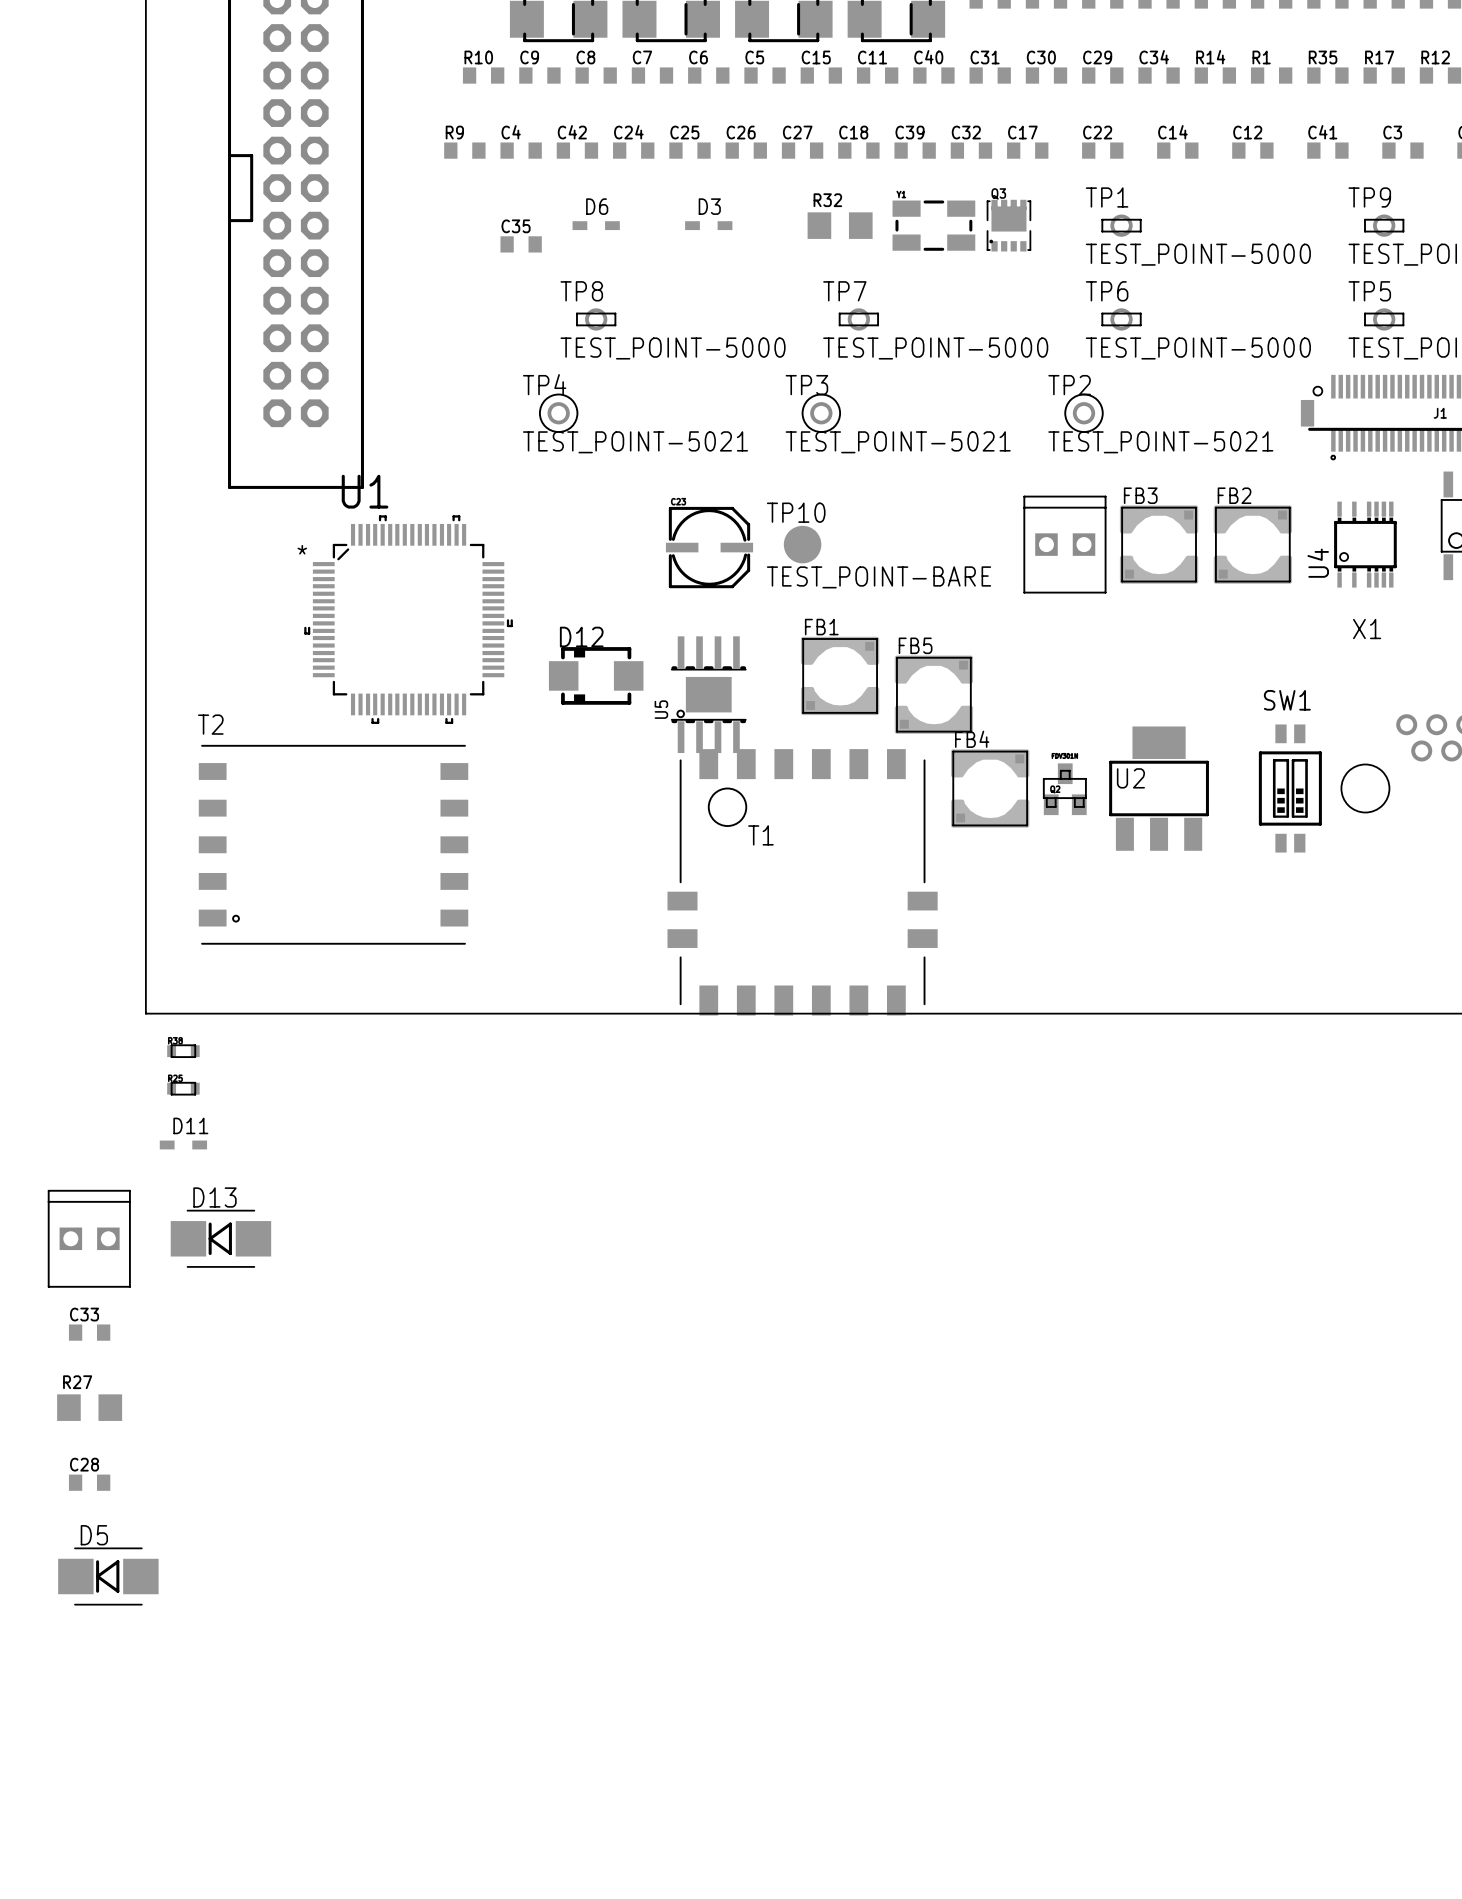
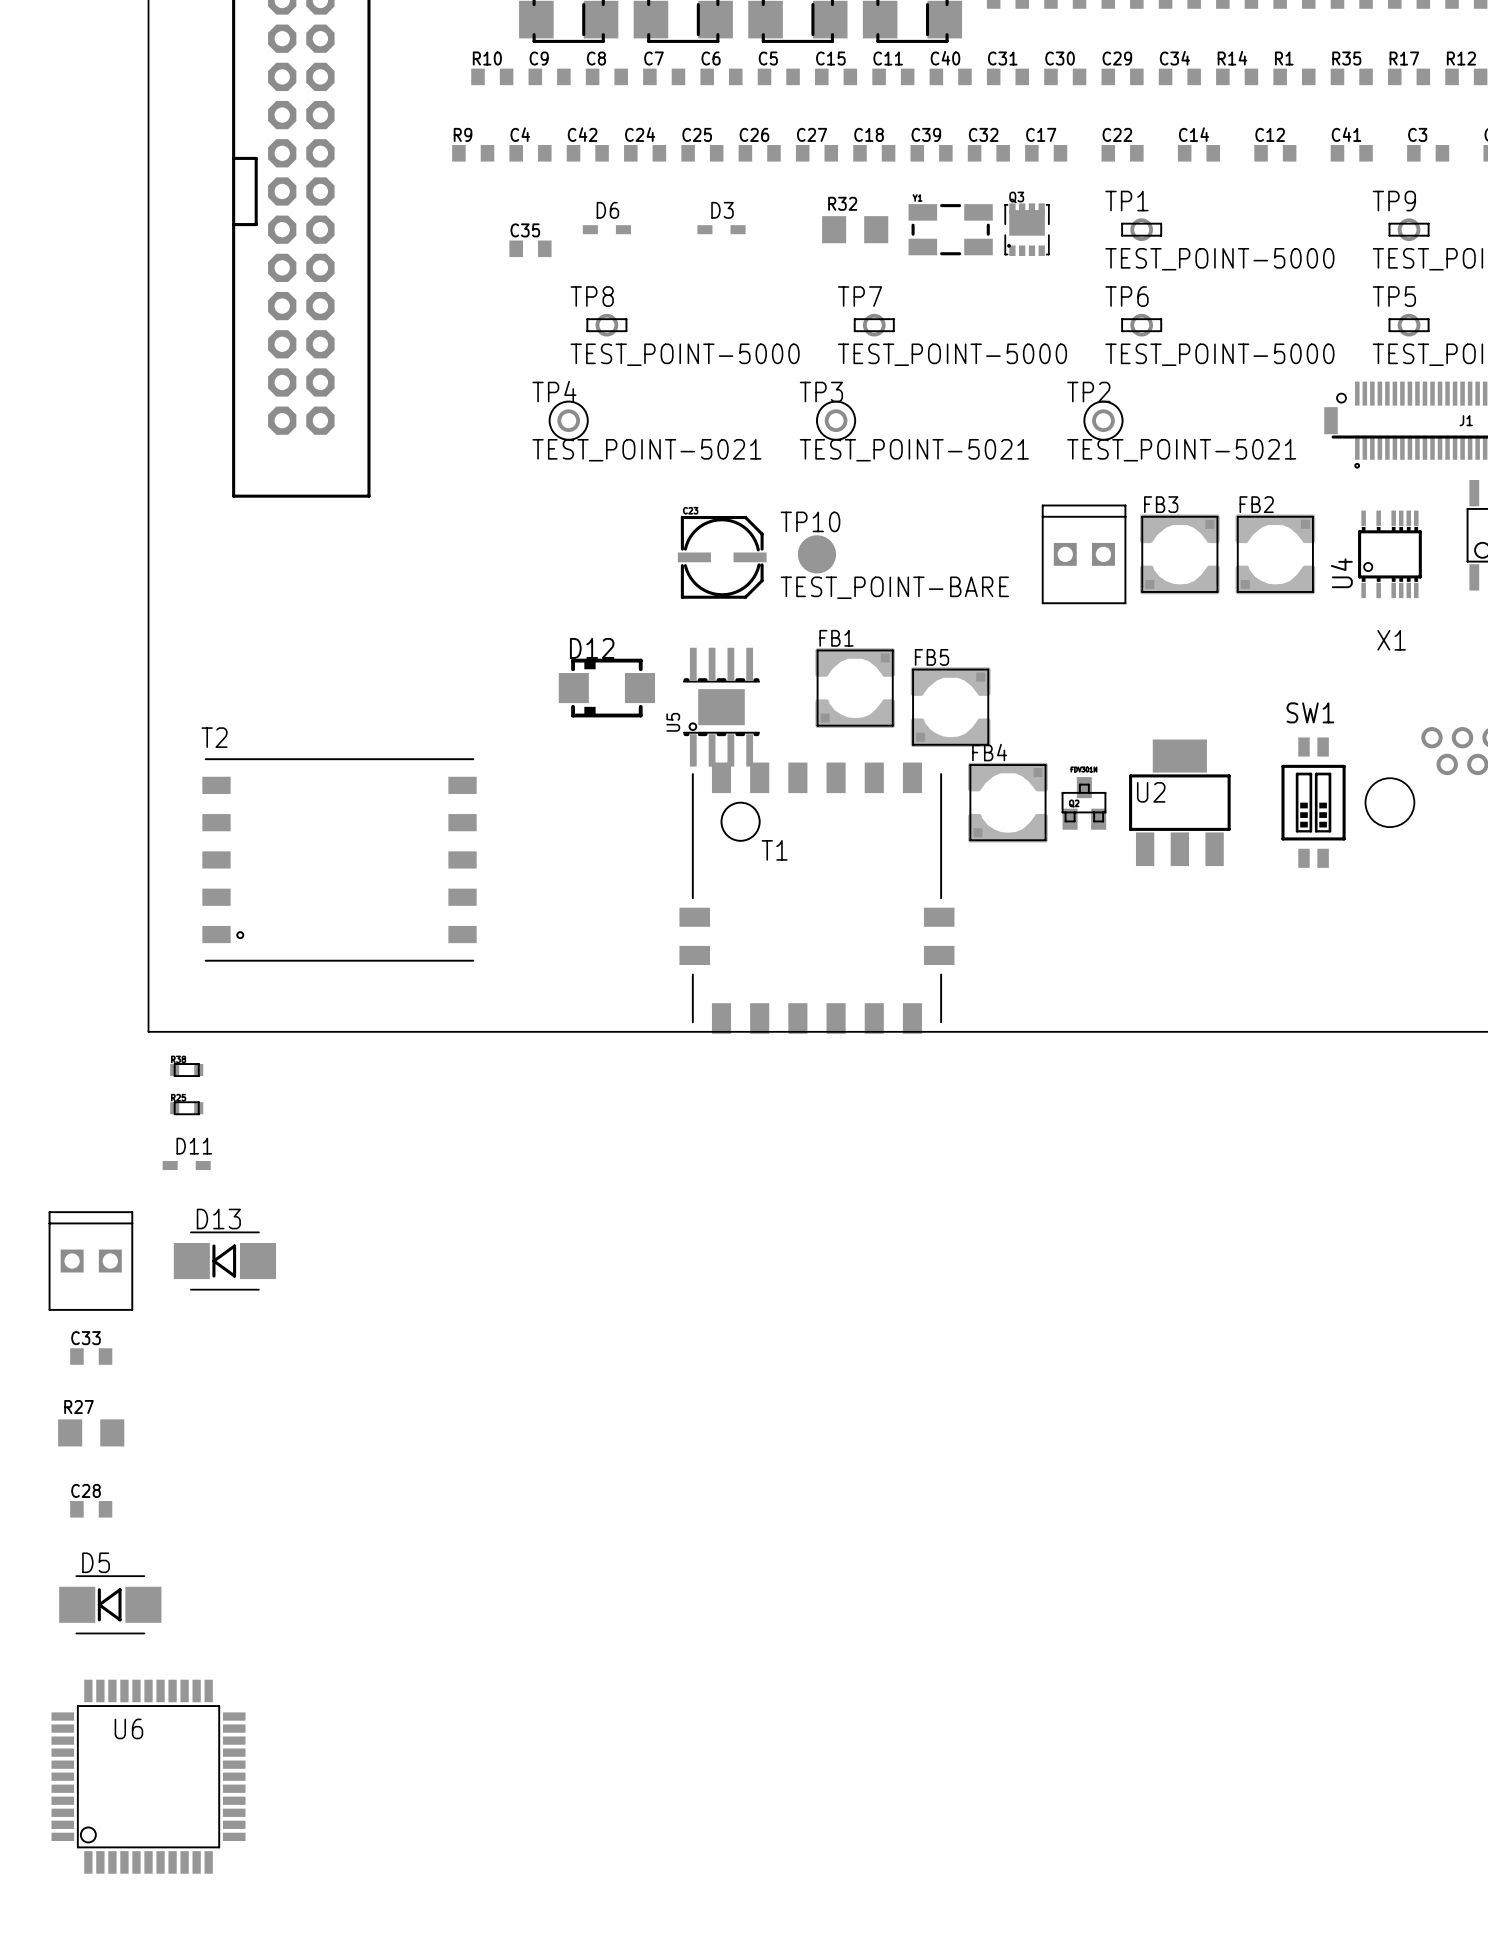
U1: (408, 619) -> none
U6: none -> (148, 1776)

